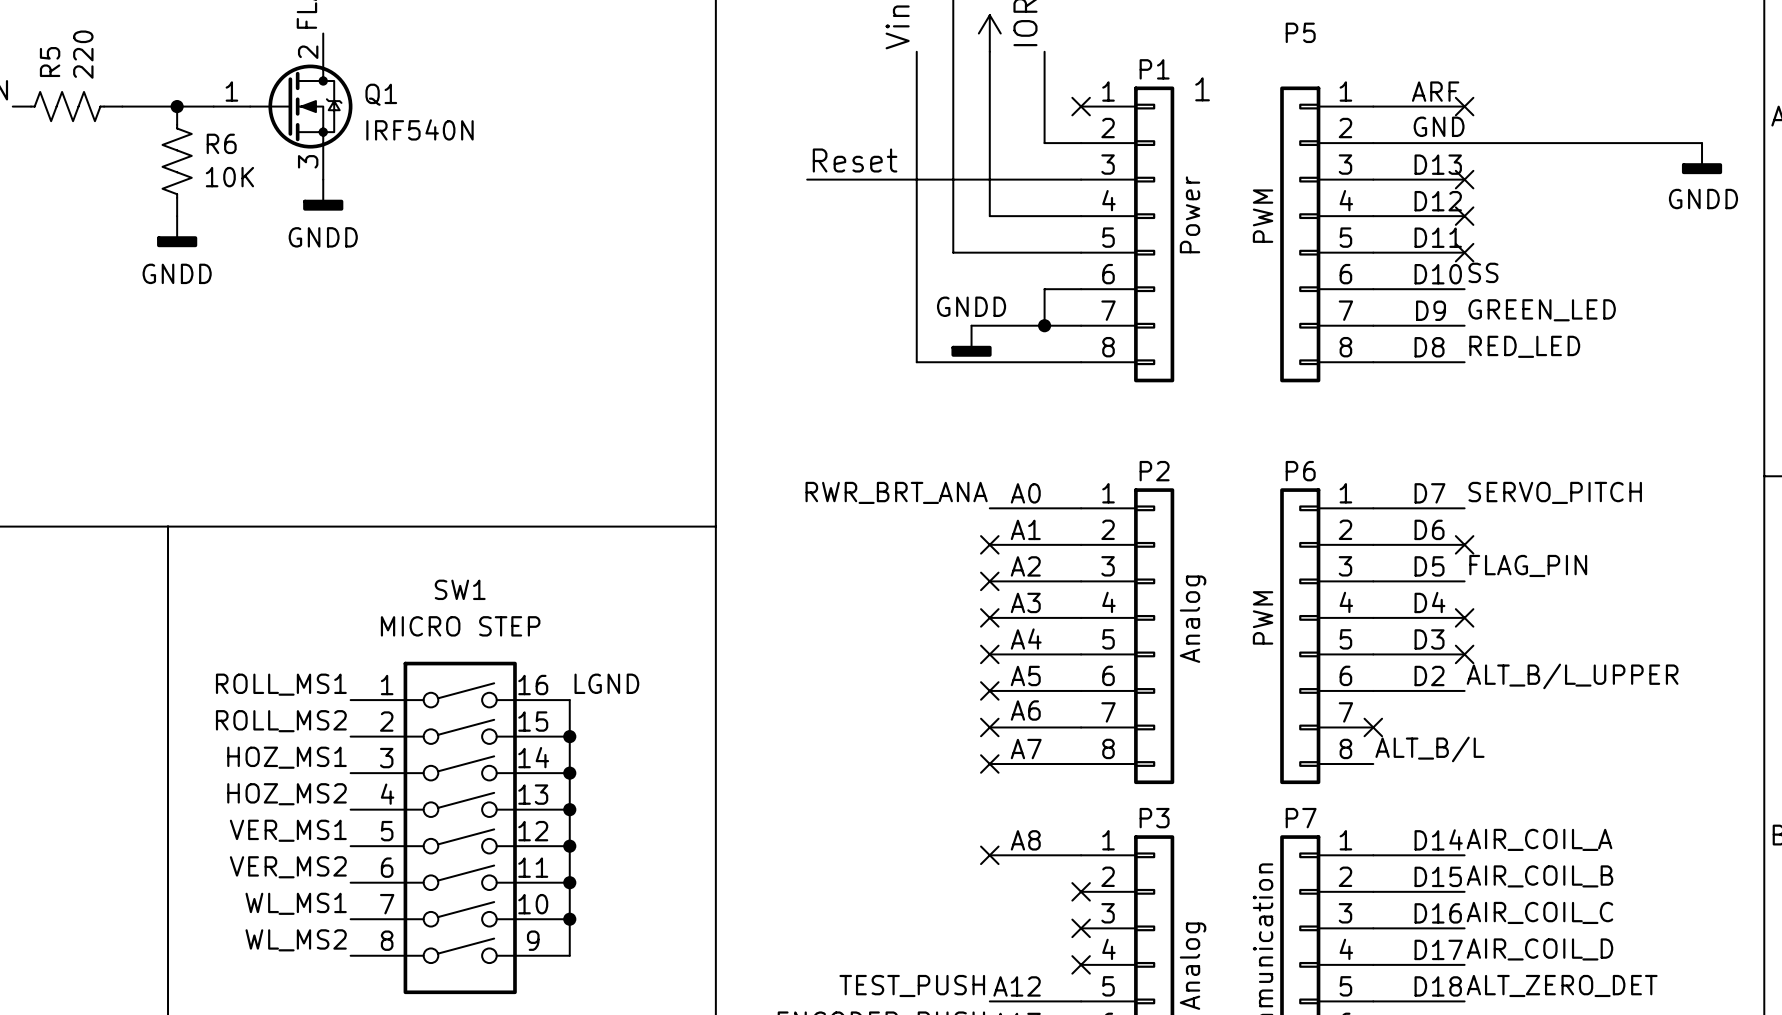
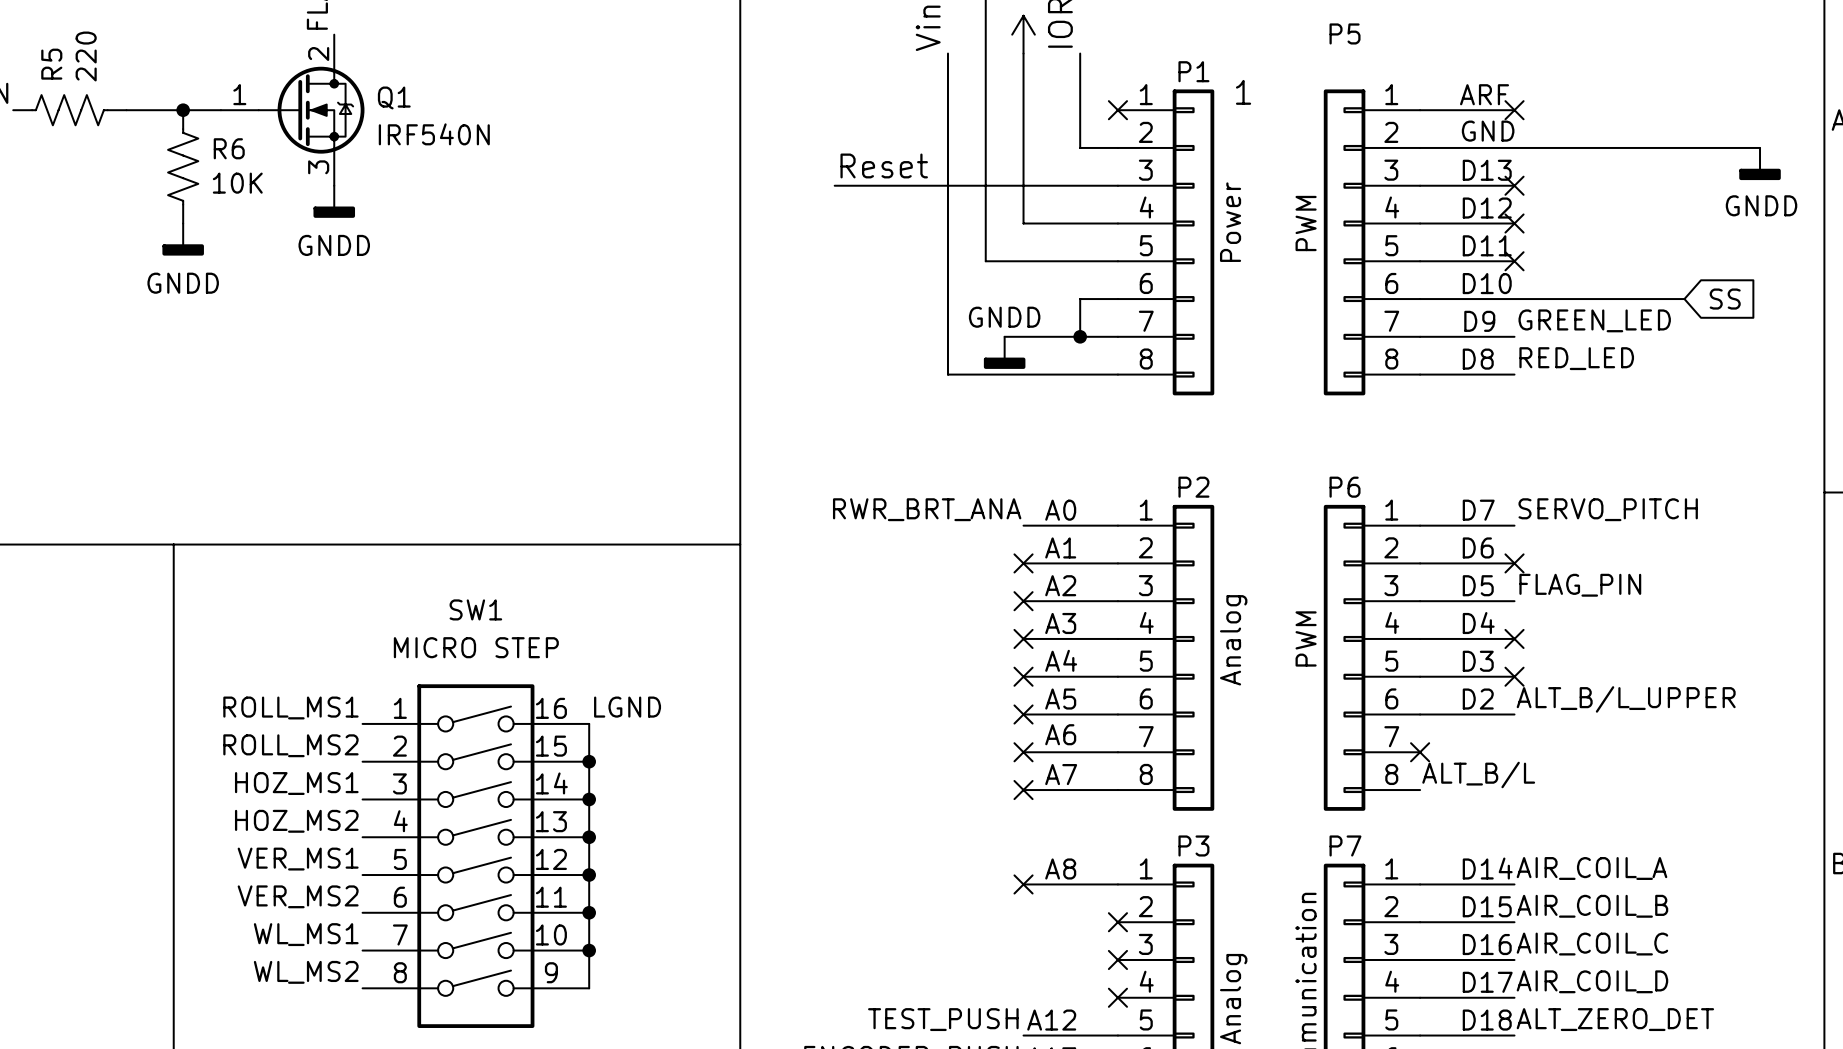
label: SS (1483, 272) -> none
wire: none -> (1514, 299) (1684, 299)
global label: none -> SS (1725, 299)

